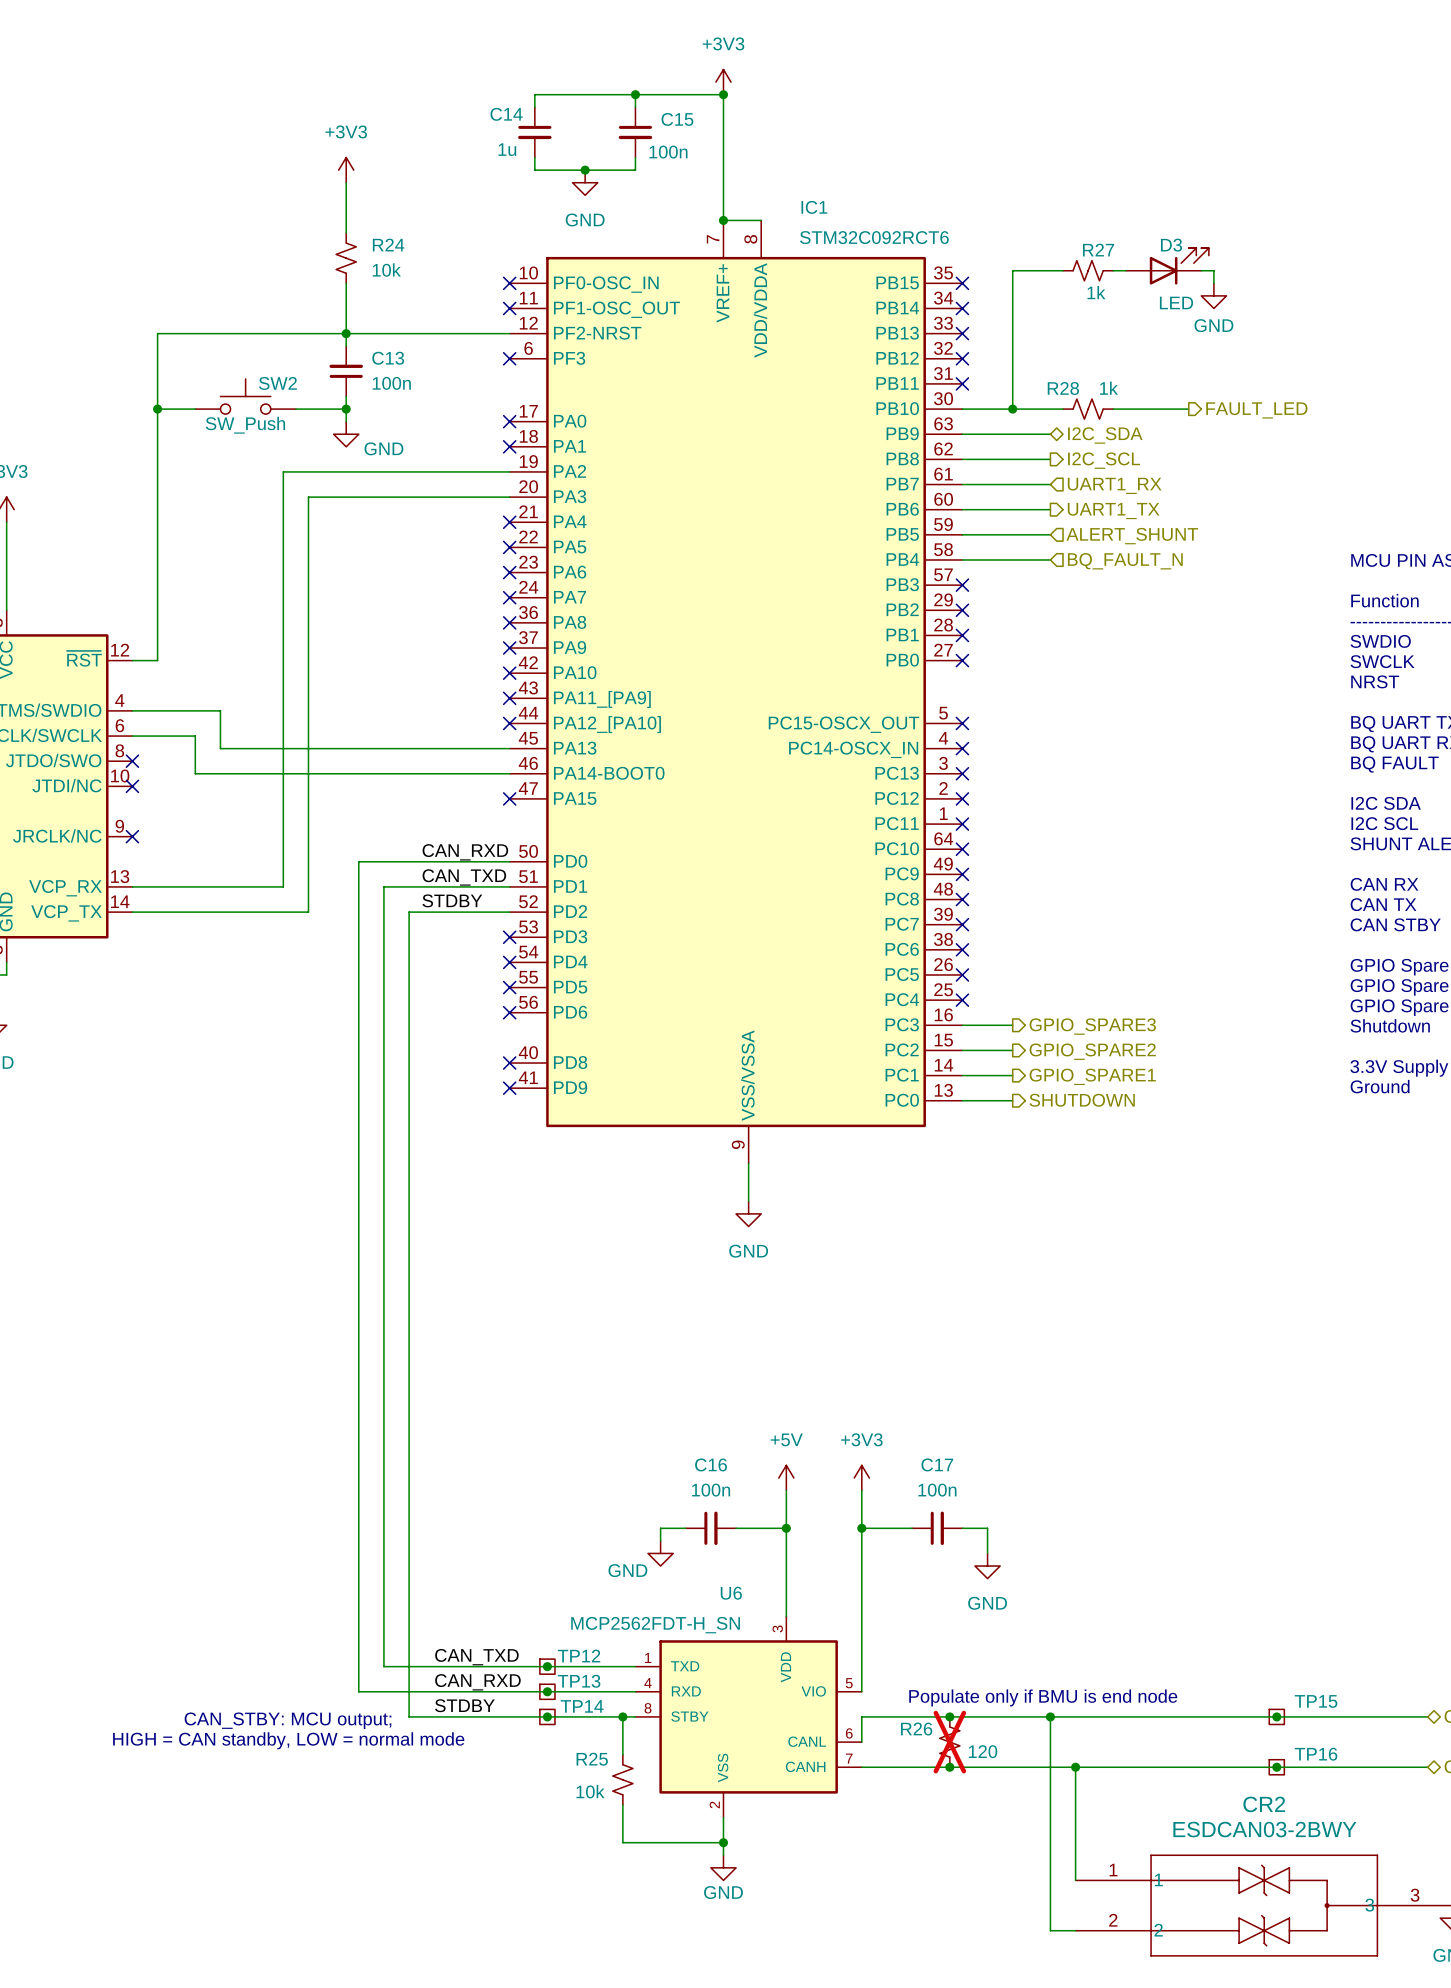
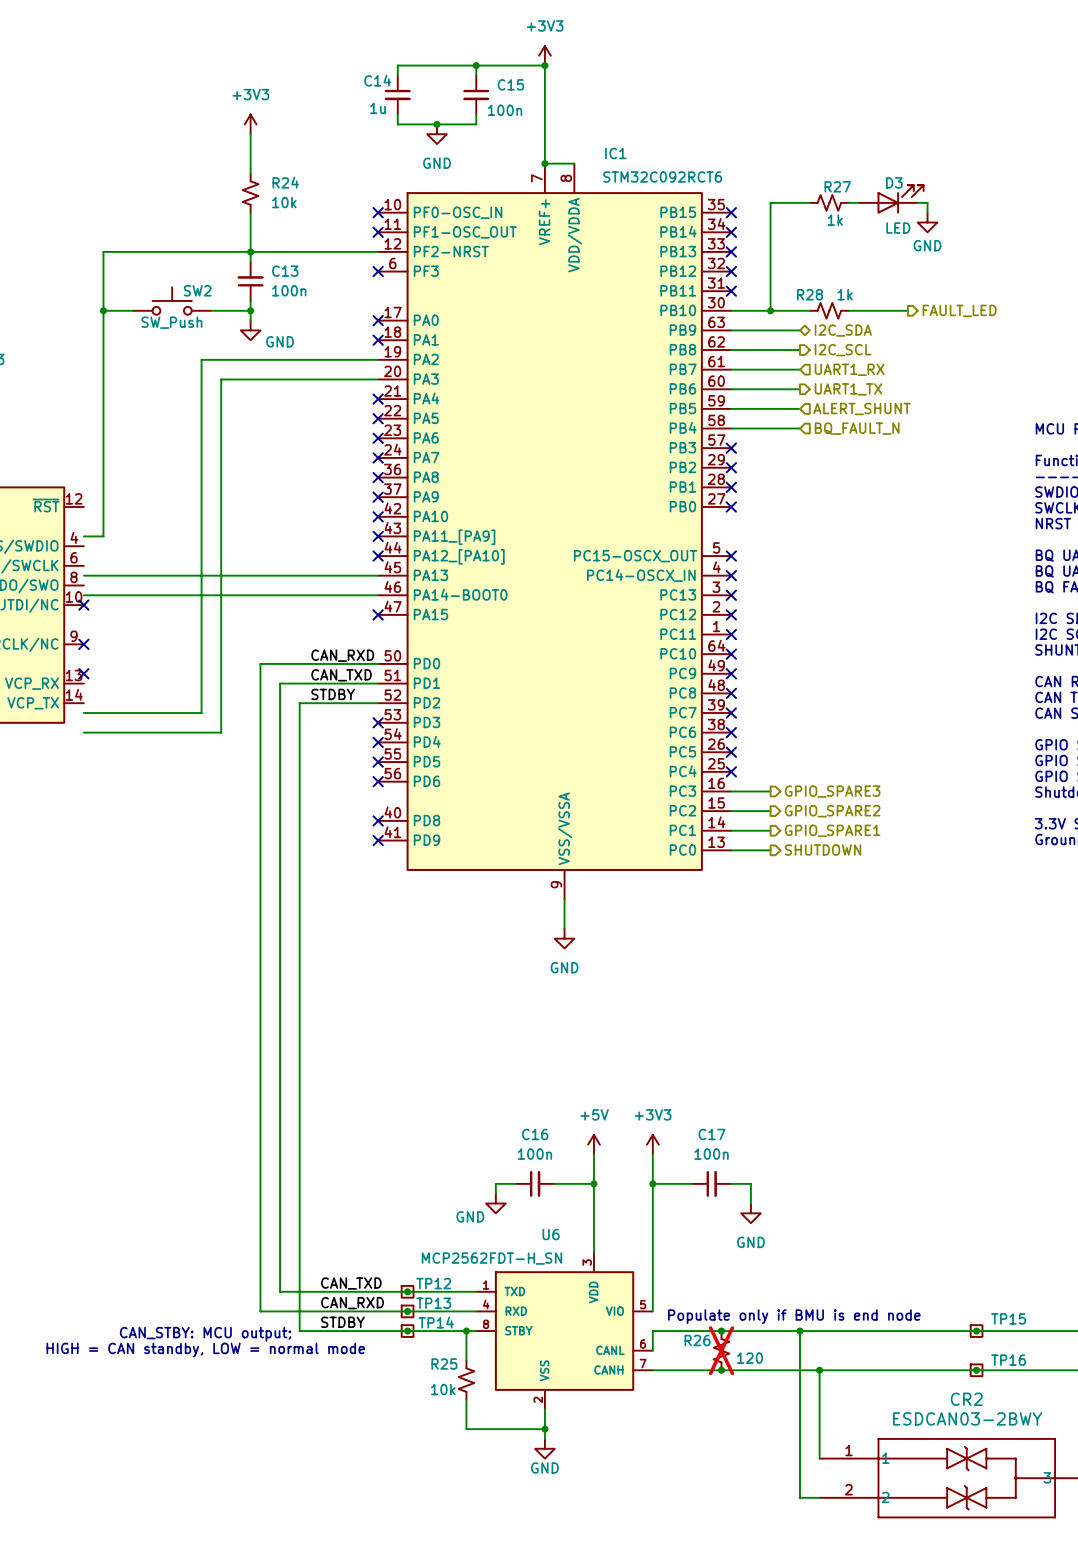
wire: (132, 660) (157, 660) -> (83, 536) (103, 536) (103, 507)
wire: (132, 710) (220, 710) (220, 748) -> (83, 575) (152, 575)
wire: (132, 736) (195, 736) (195, 773) -> (83, 595) (132, 595)
no-connect mark: (132, 761) -> none
no-connect mark: none -> (83, 673)
wire: (132, 886) (283, 886) -> (83, 713) (201, 713) (201, 683)
wire: (132, 912) (308, 912) -> (83, 732) (221, 732) (221, 703)

